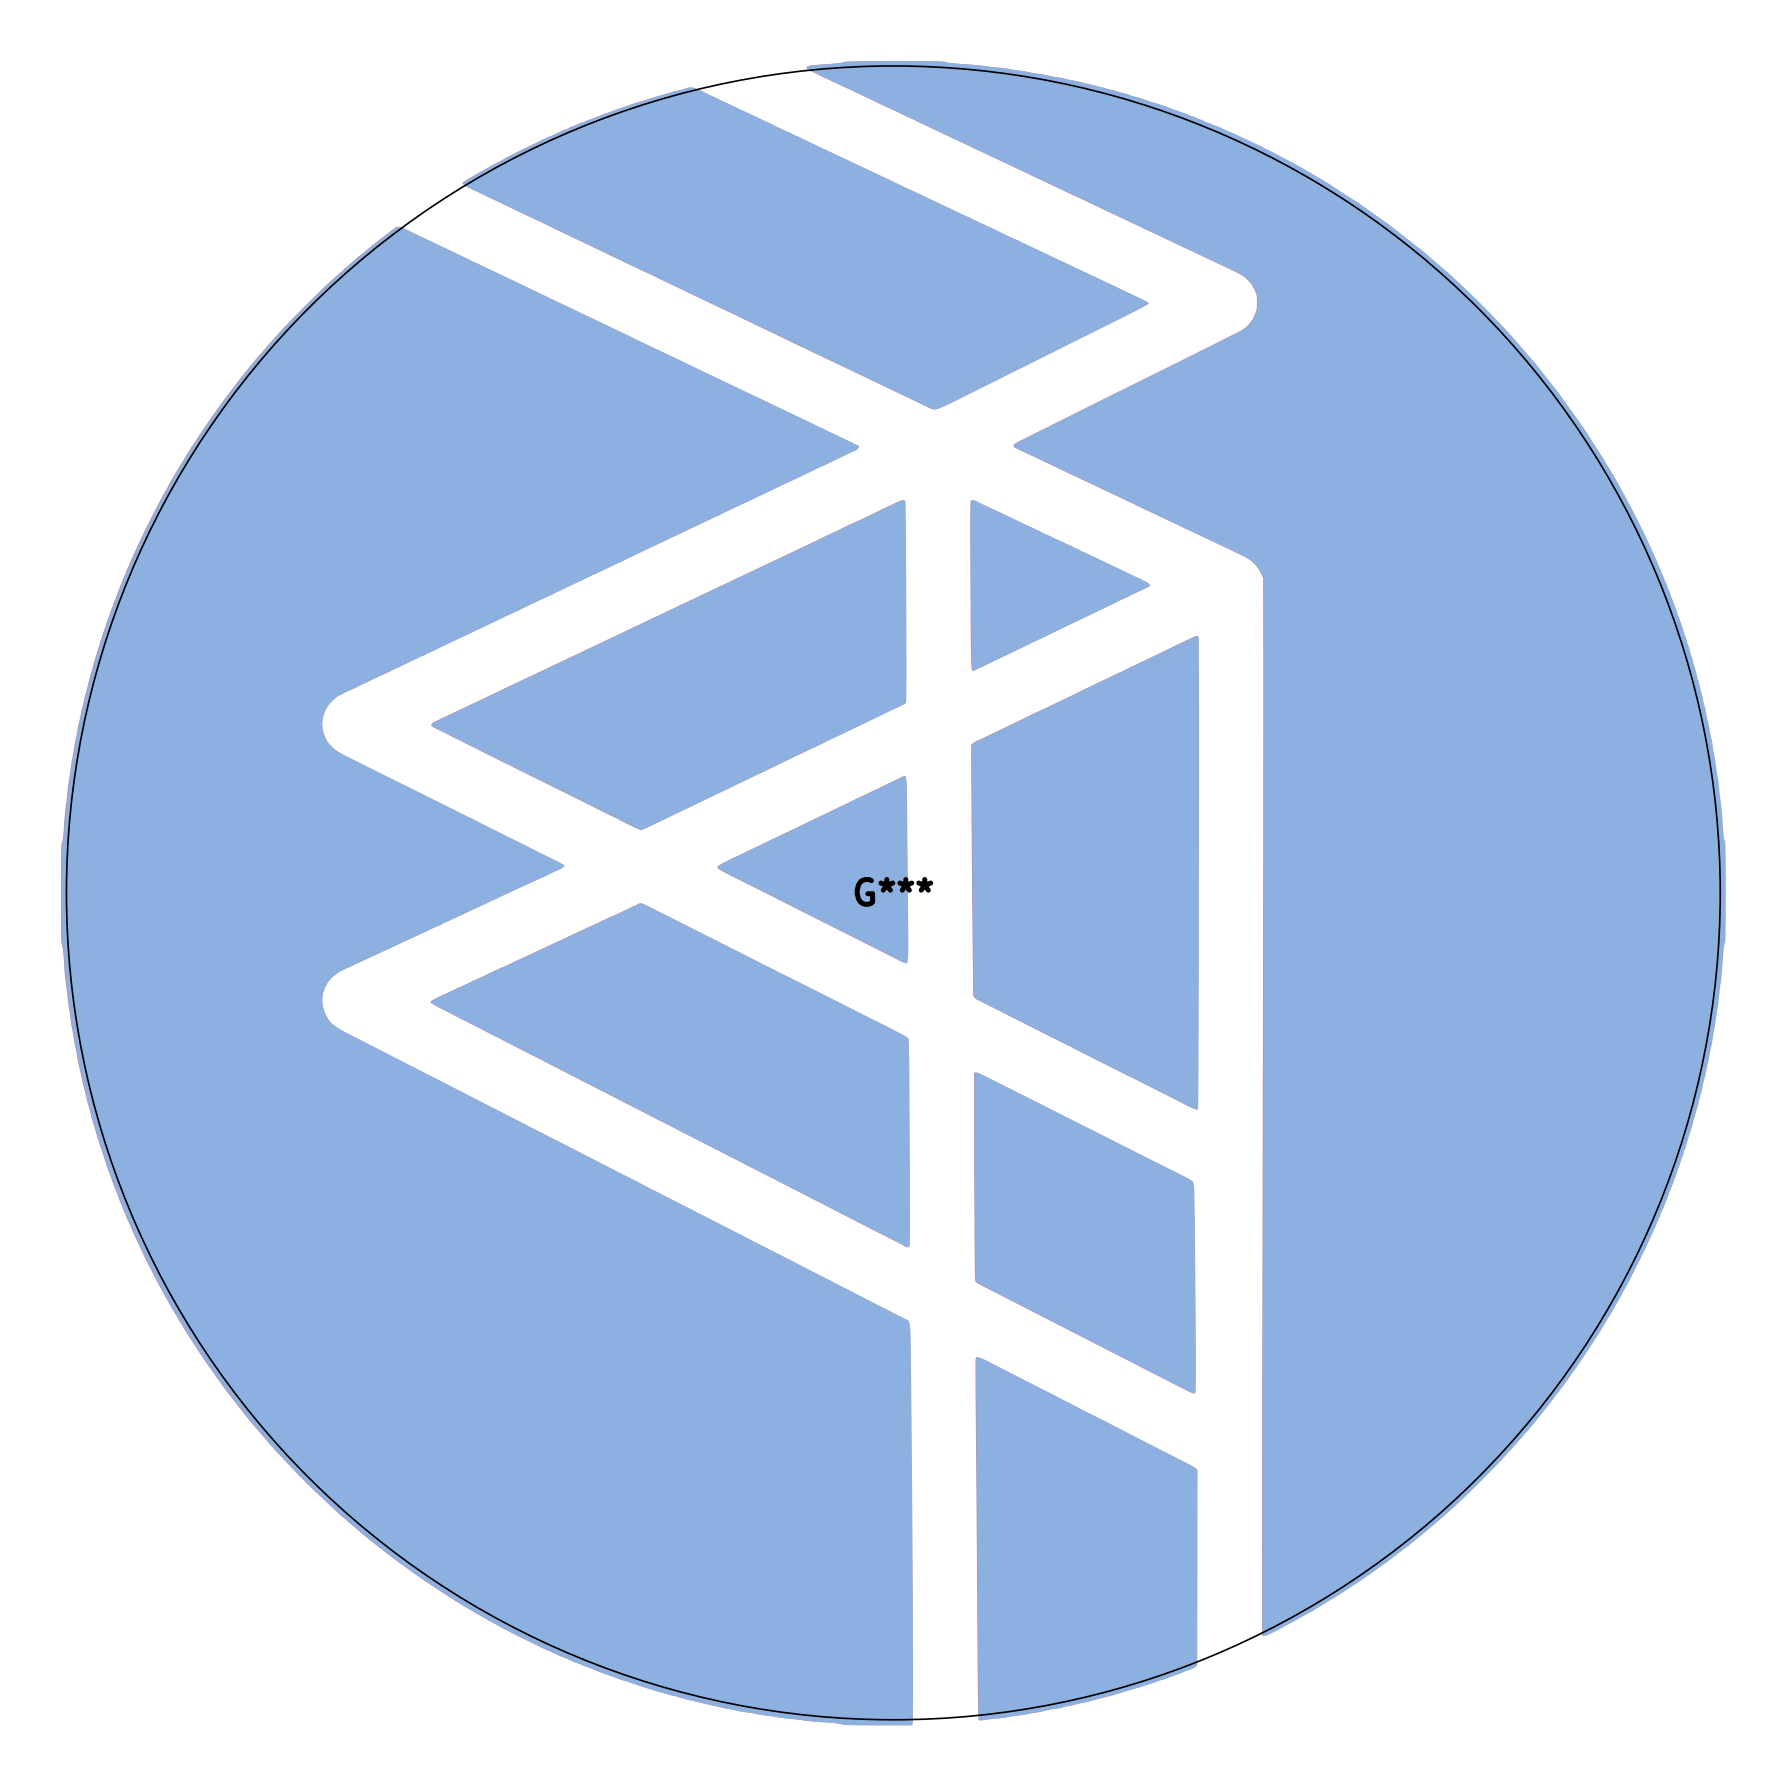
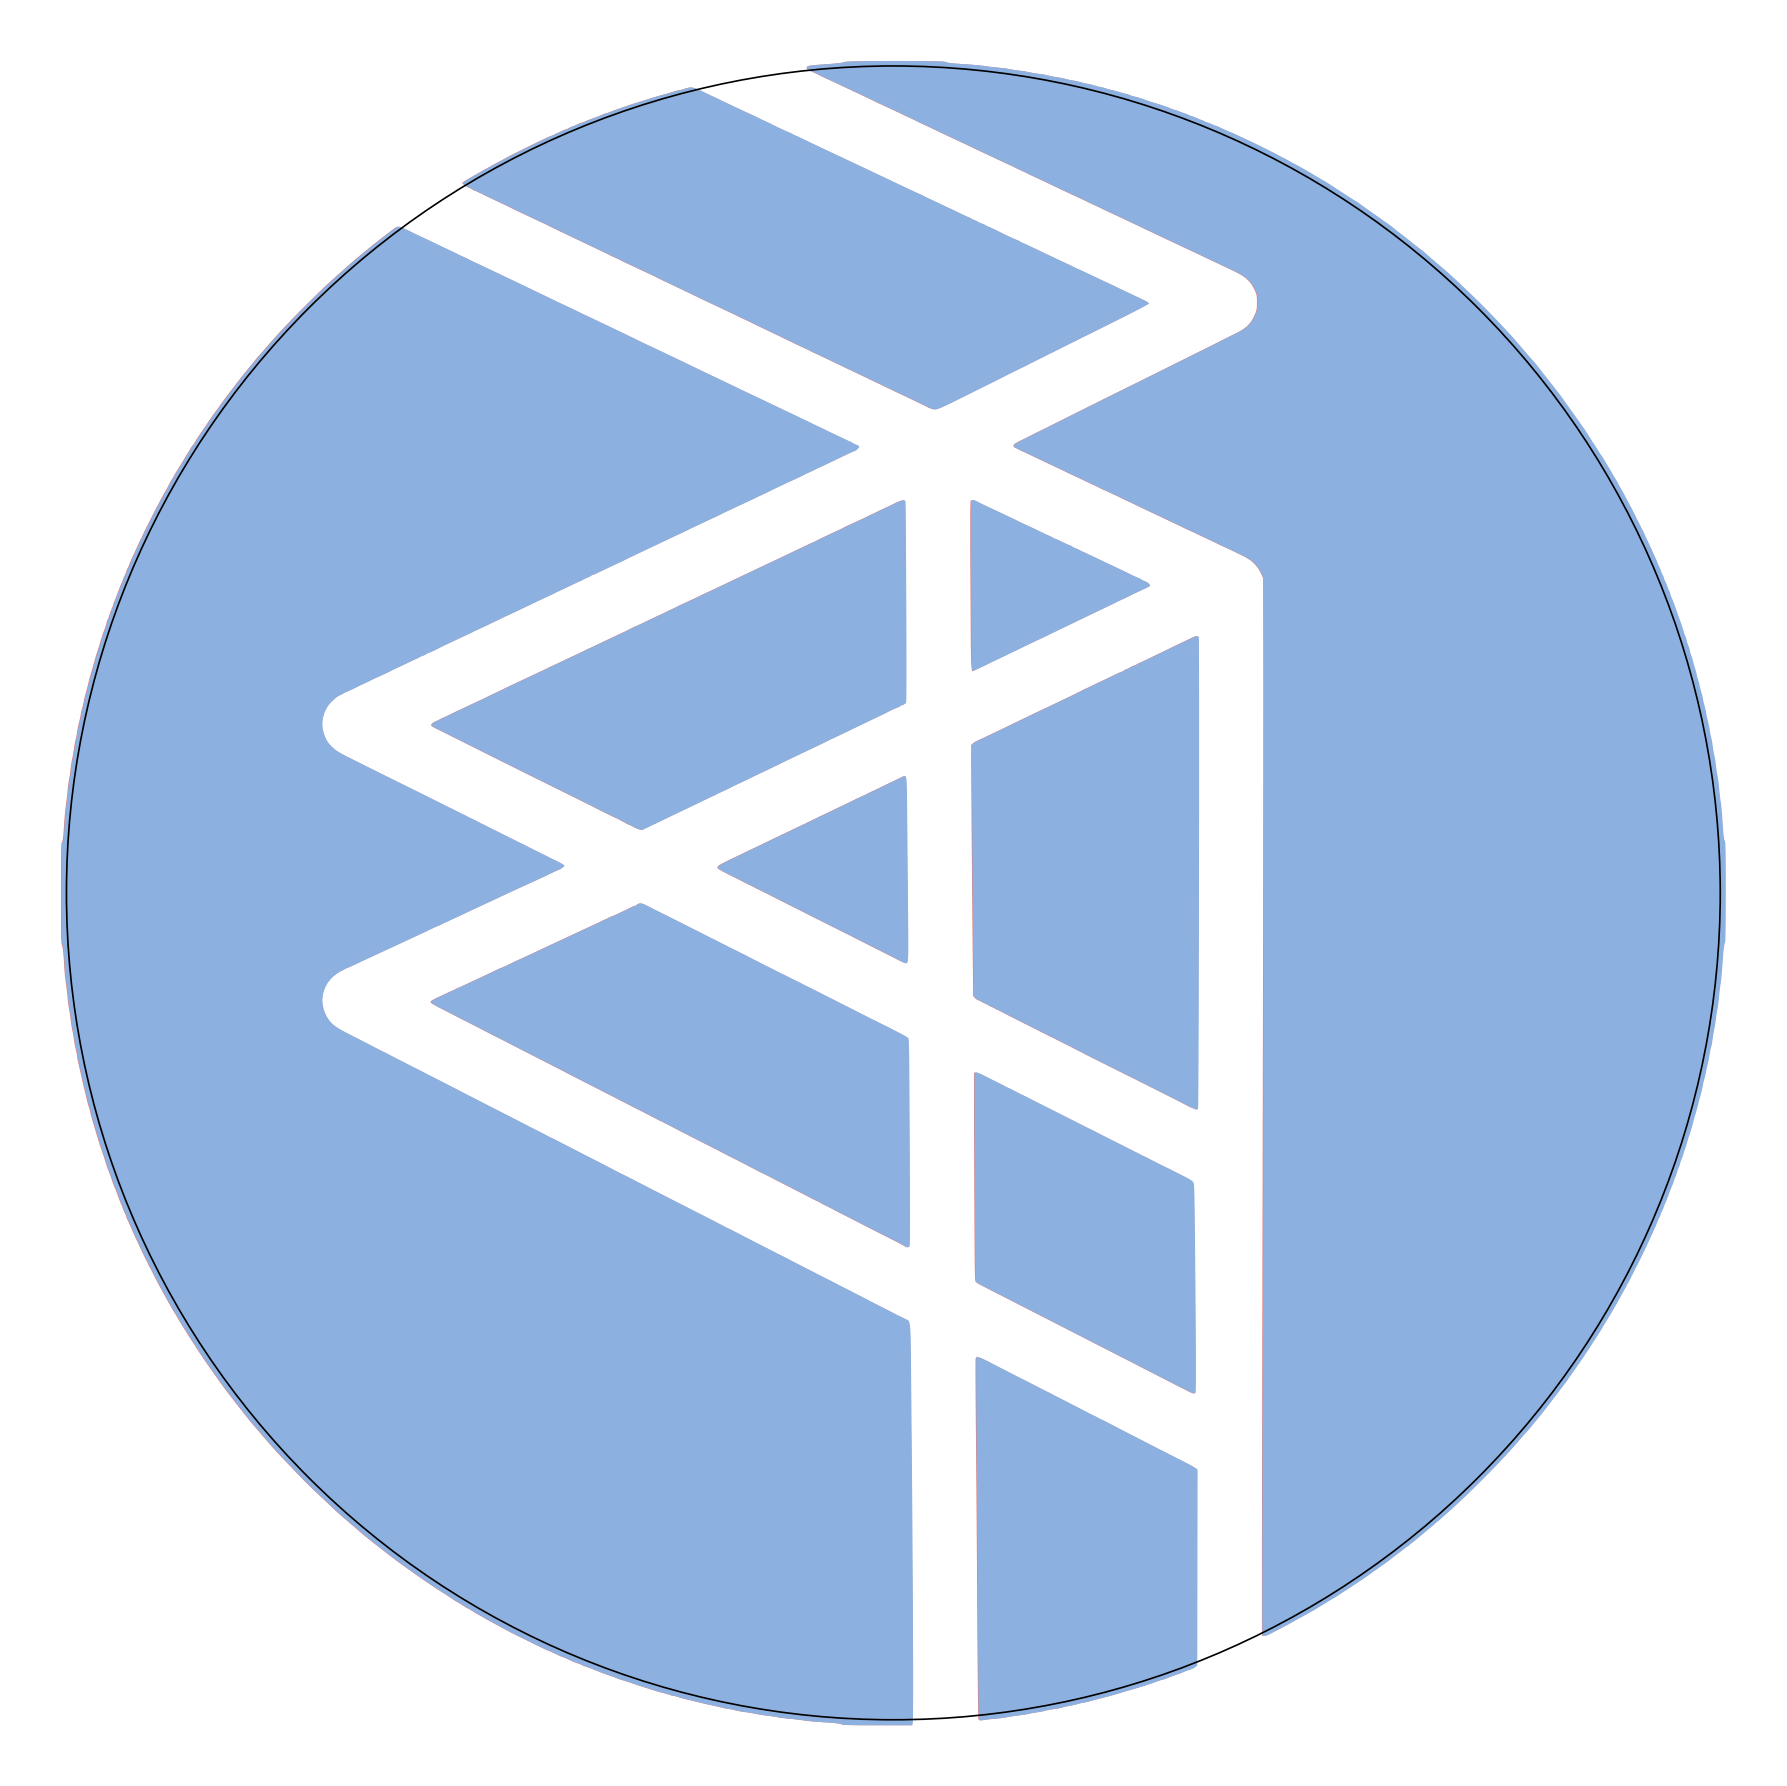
drawing: none -> [61, 60, 1726, 1726]
G***: (893, 893) -> none

